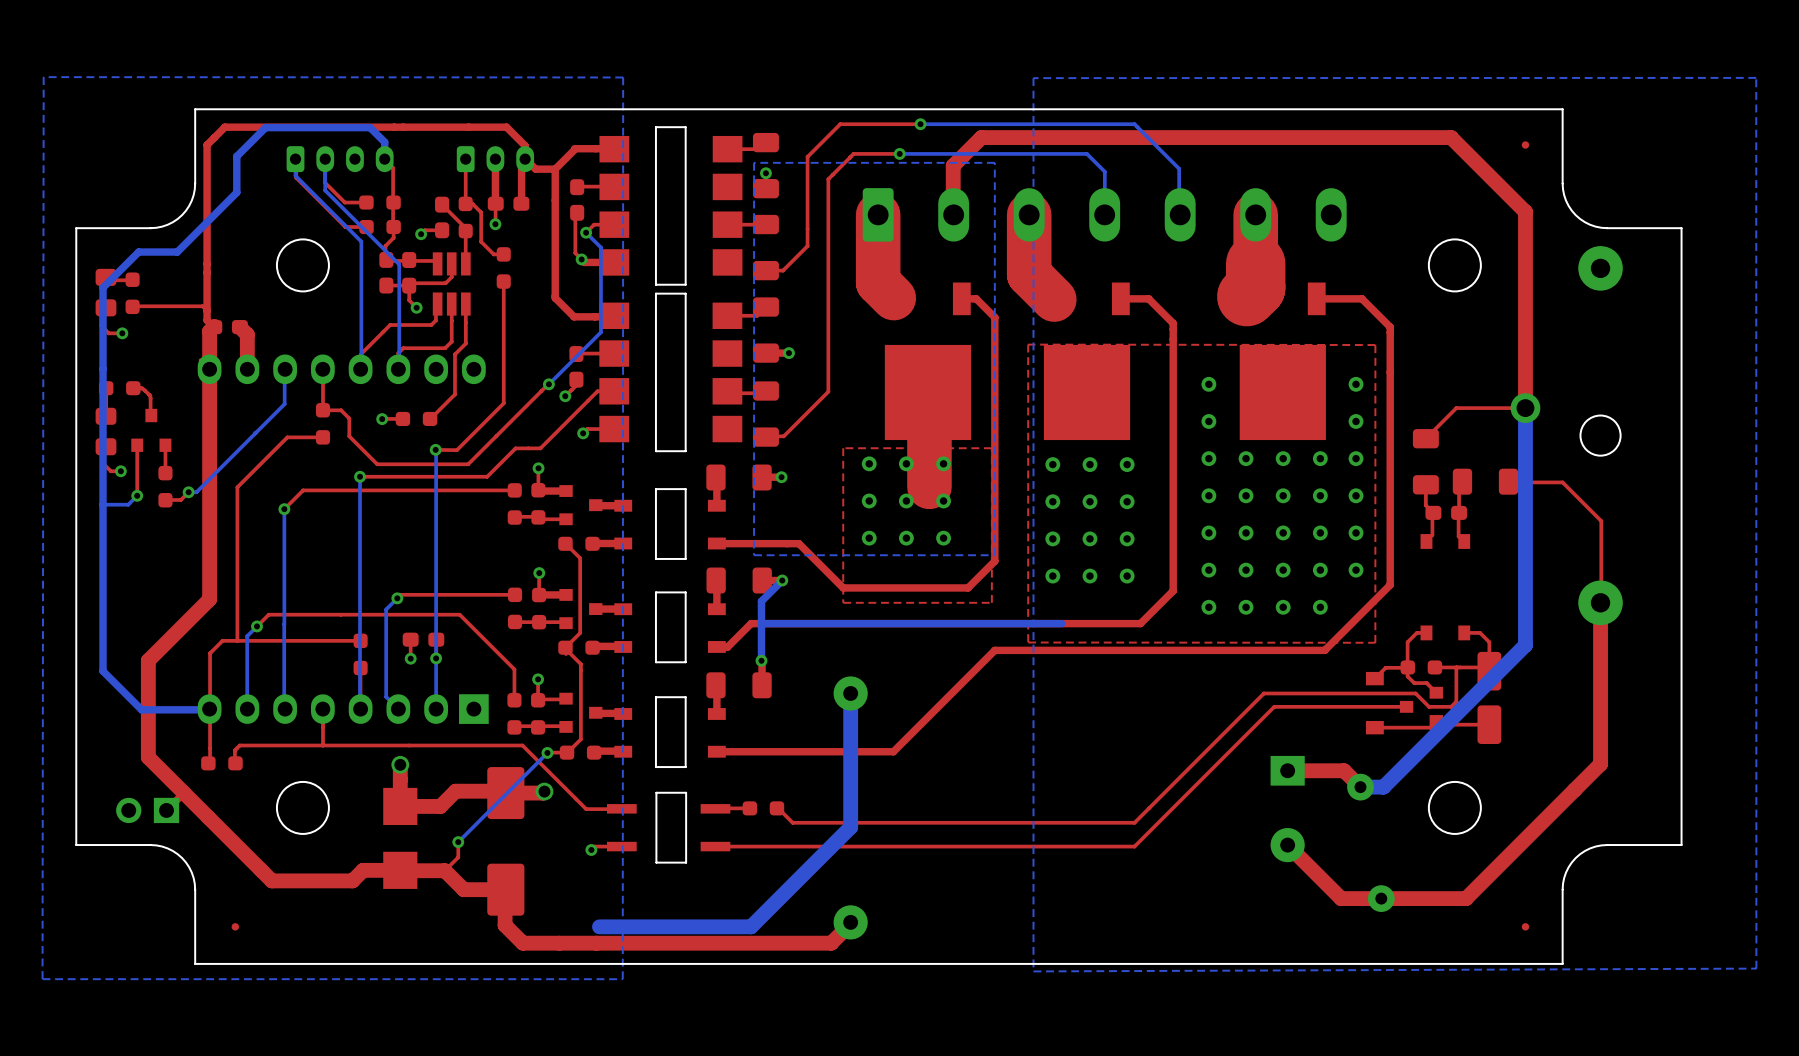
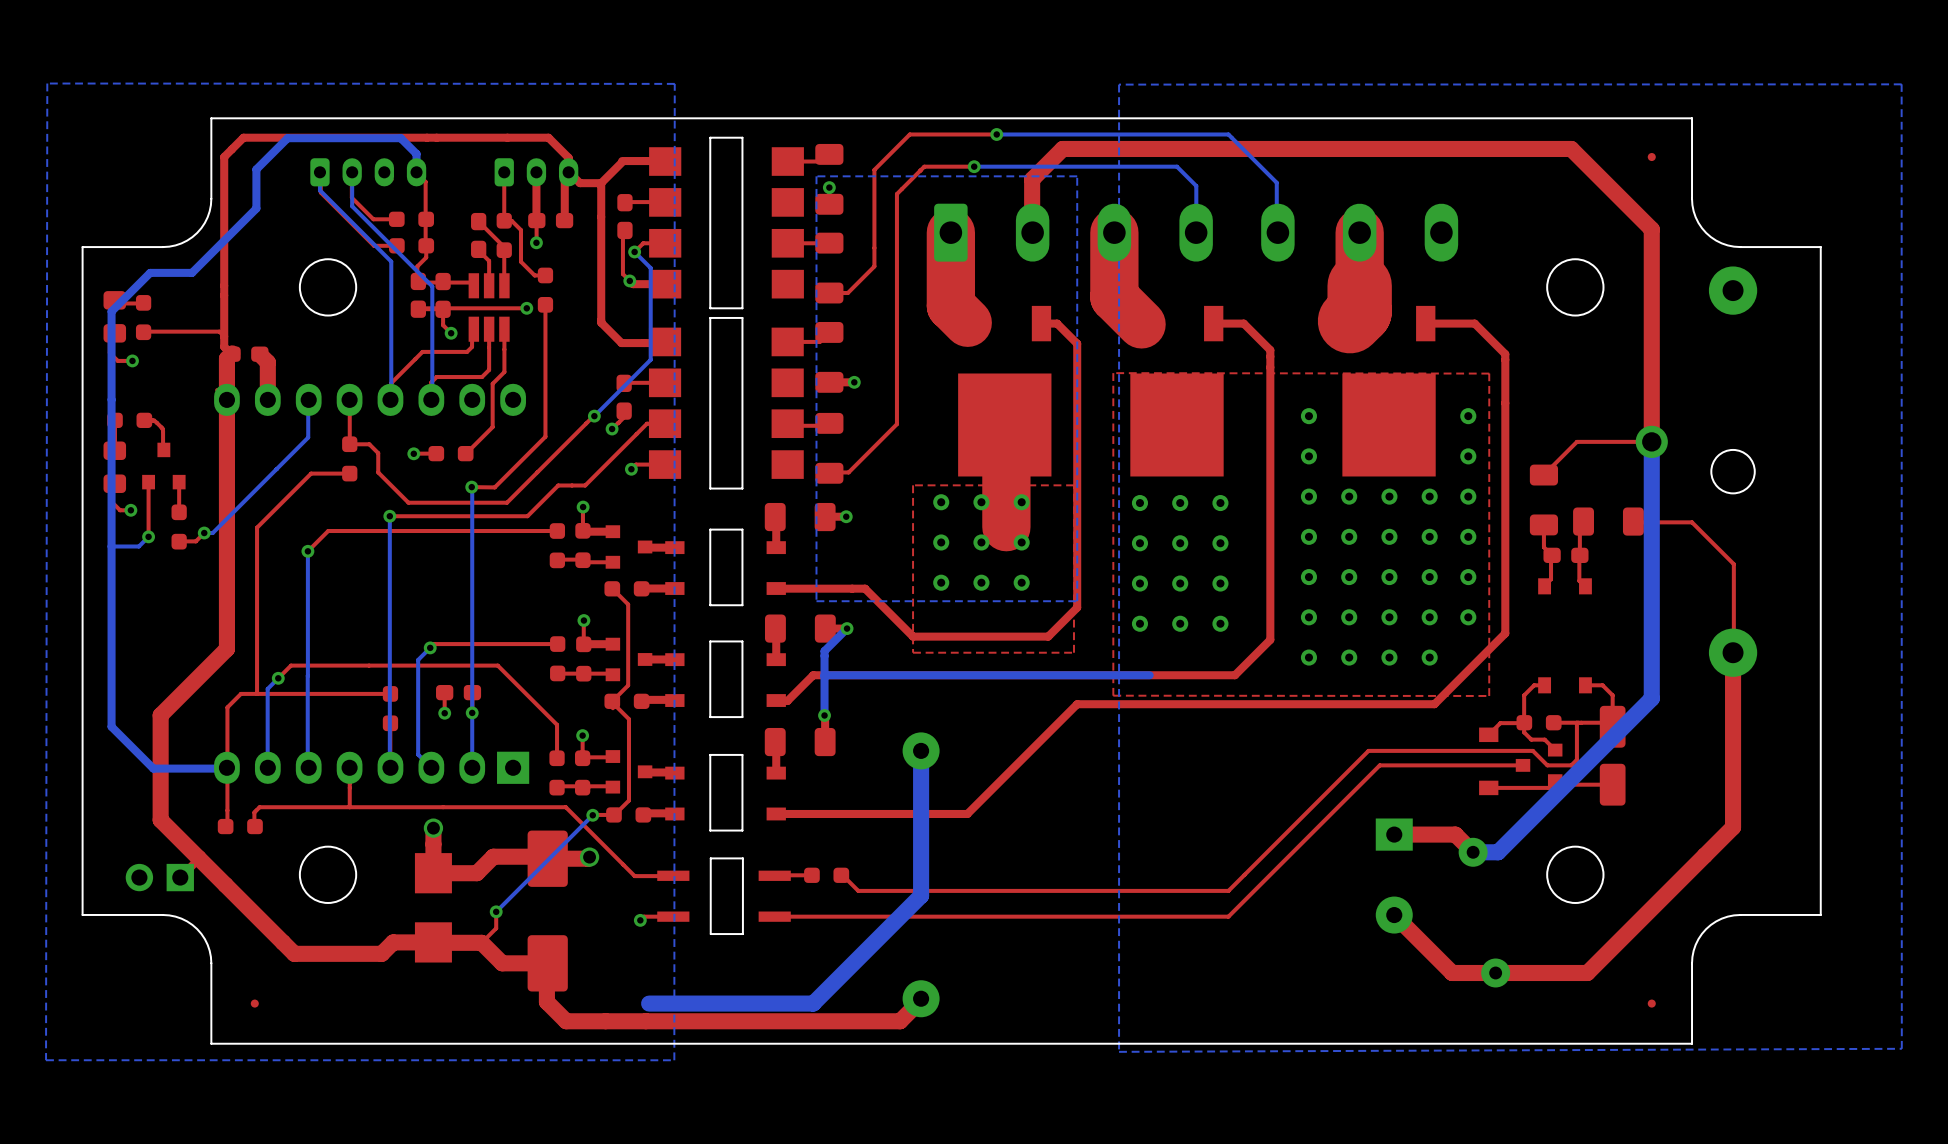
top track: (442, 230) (425, 230) (421, 234) -> none
via position: (421, 234) -> (526, 308)
top track: (451, 263) (451, 277) (445, 283) (412, 283) (409, 286) -> (489, 285) (489, 260) (478, 250)
top track: none -> (526, 308) (417, 308)

